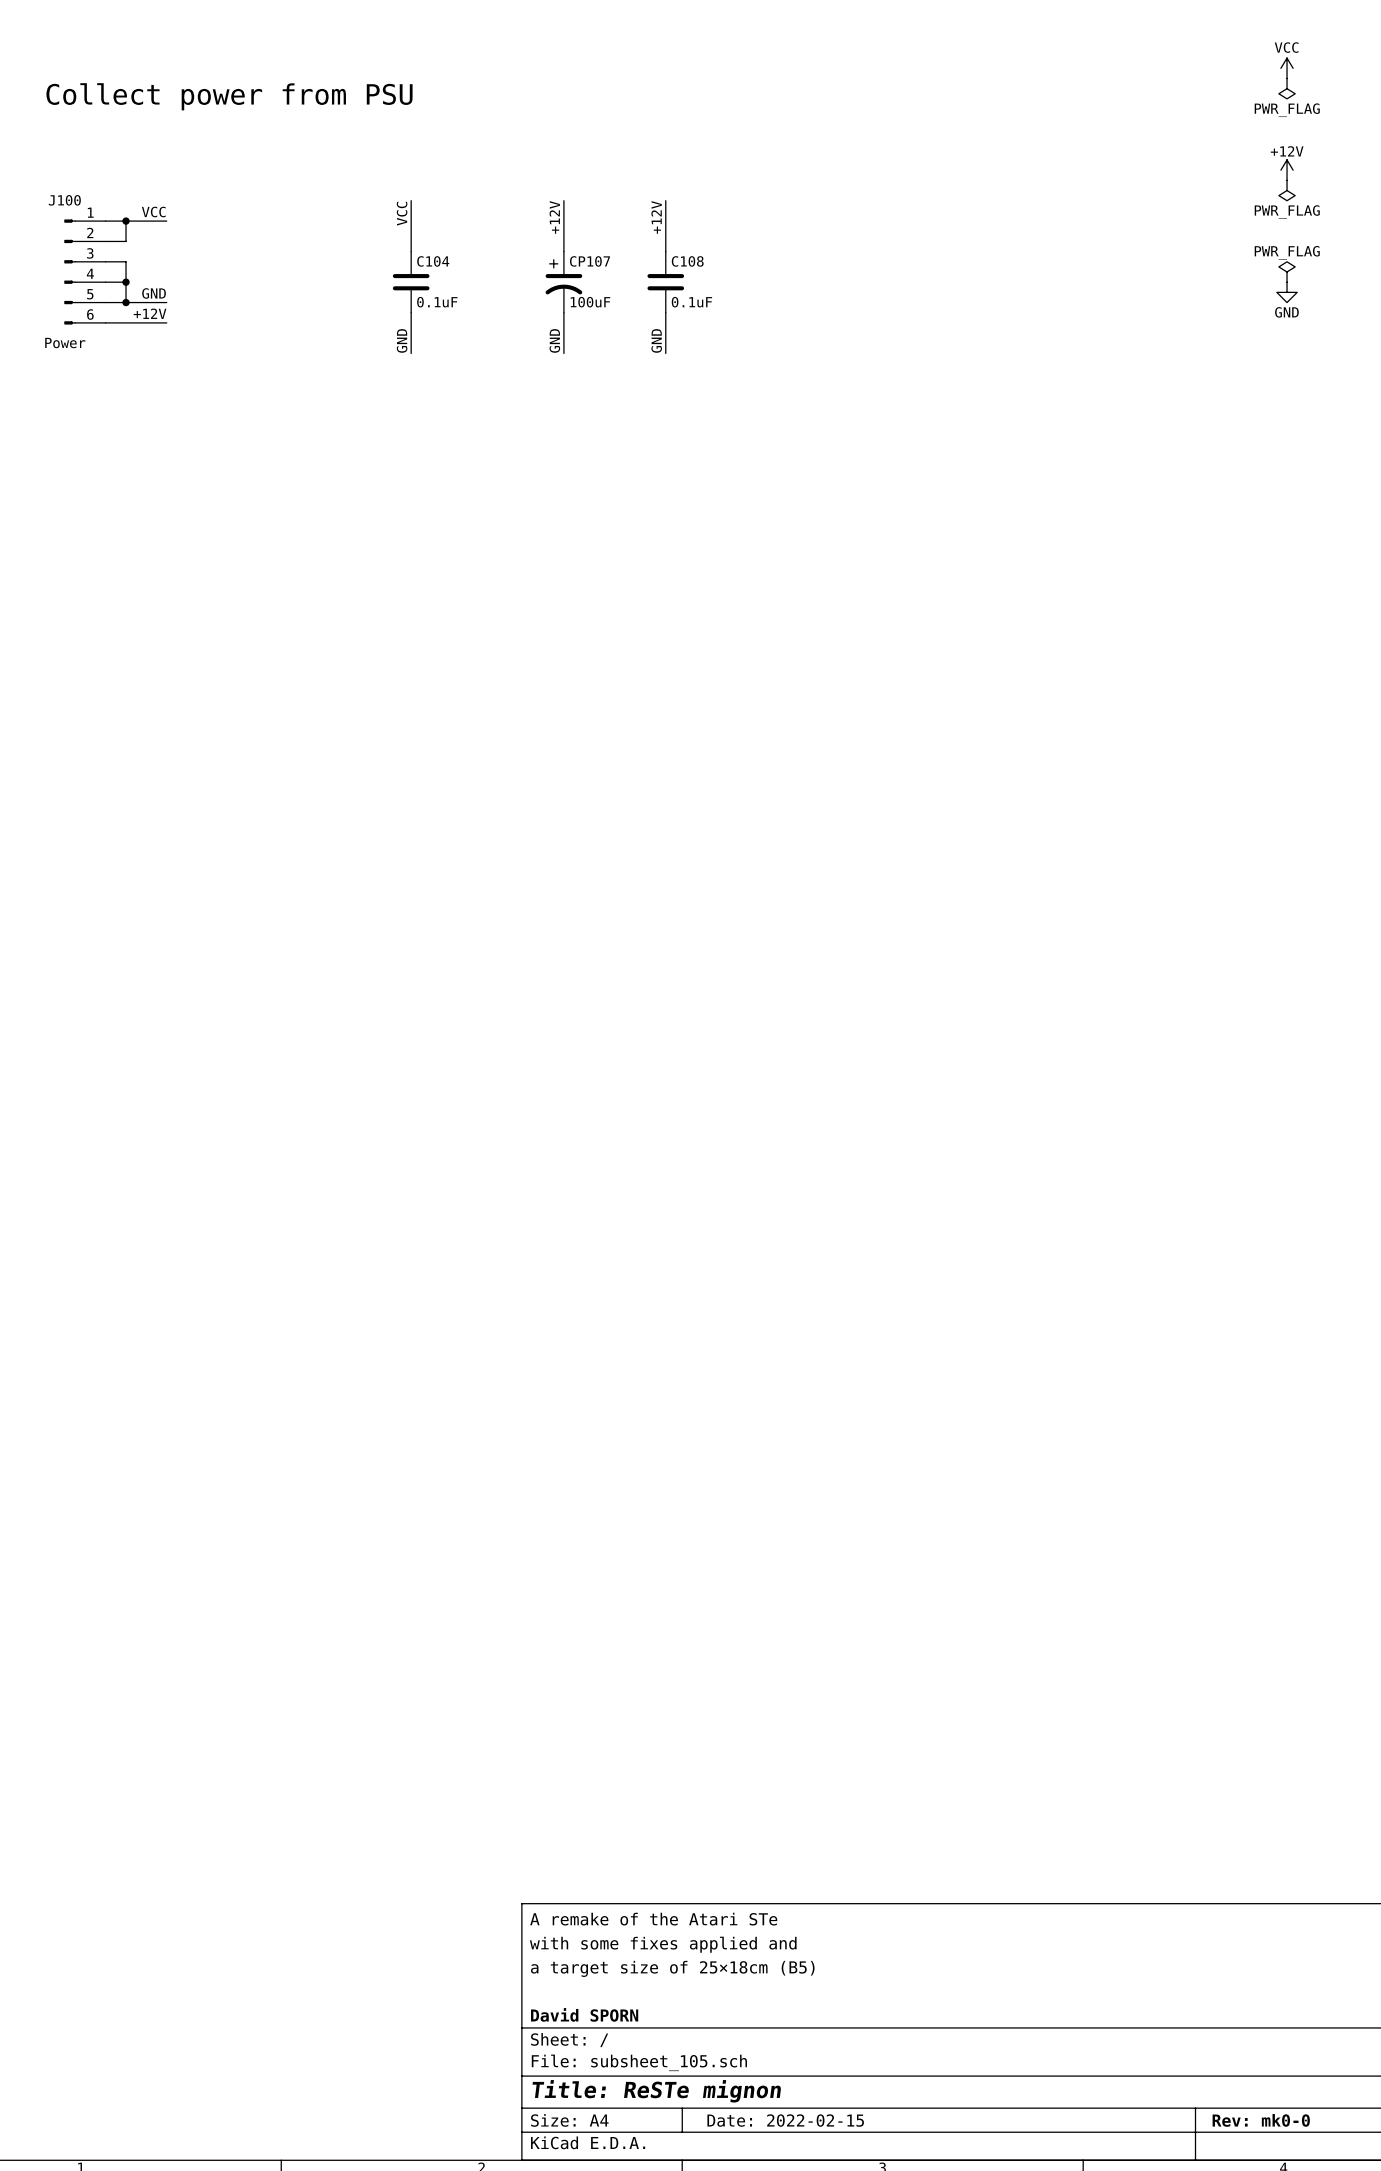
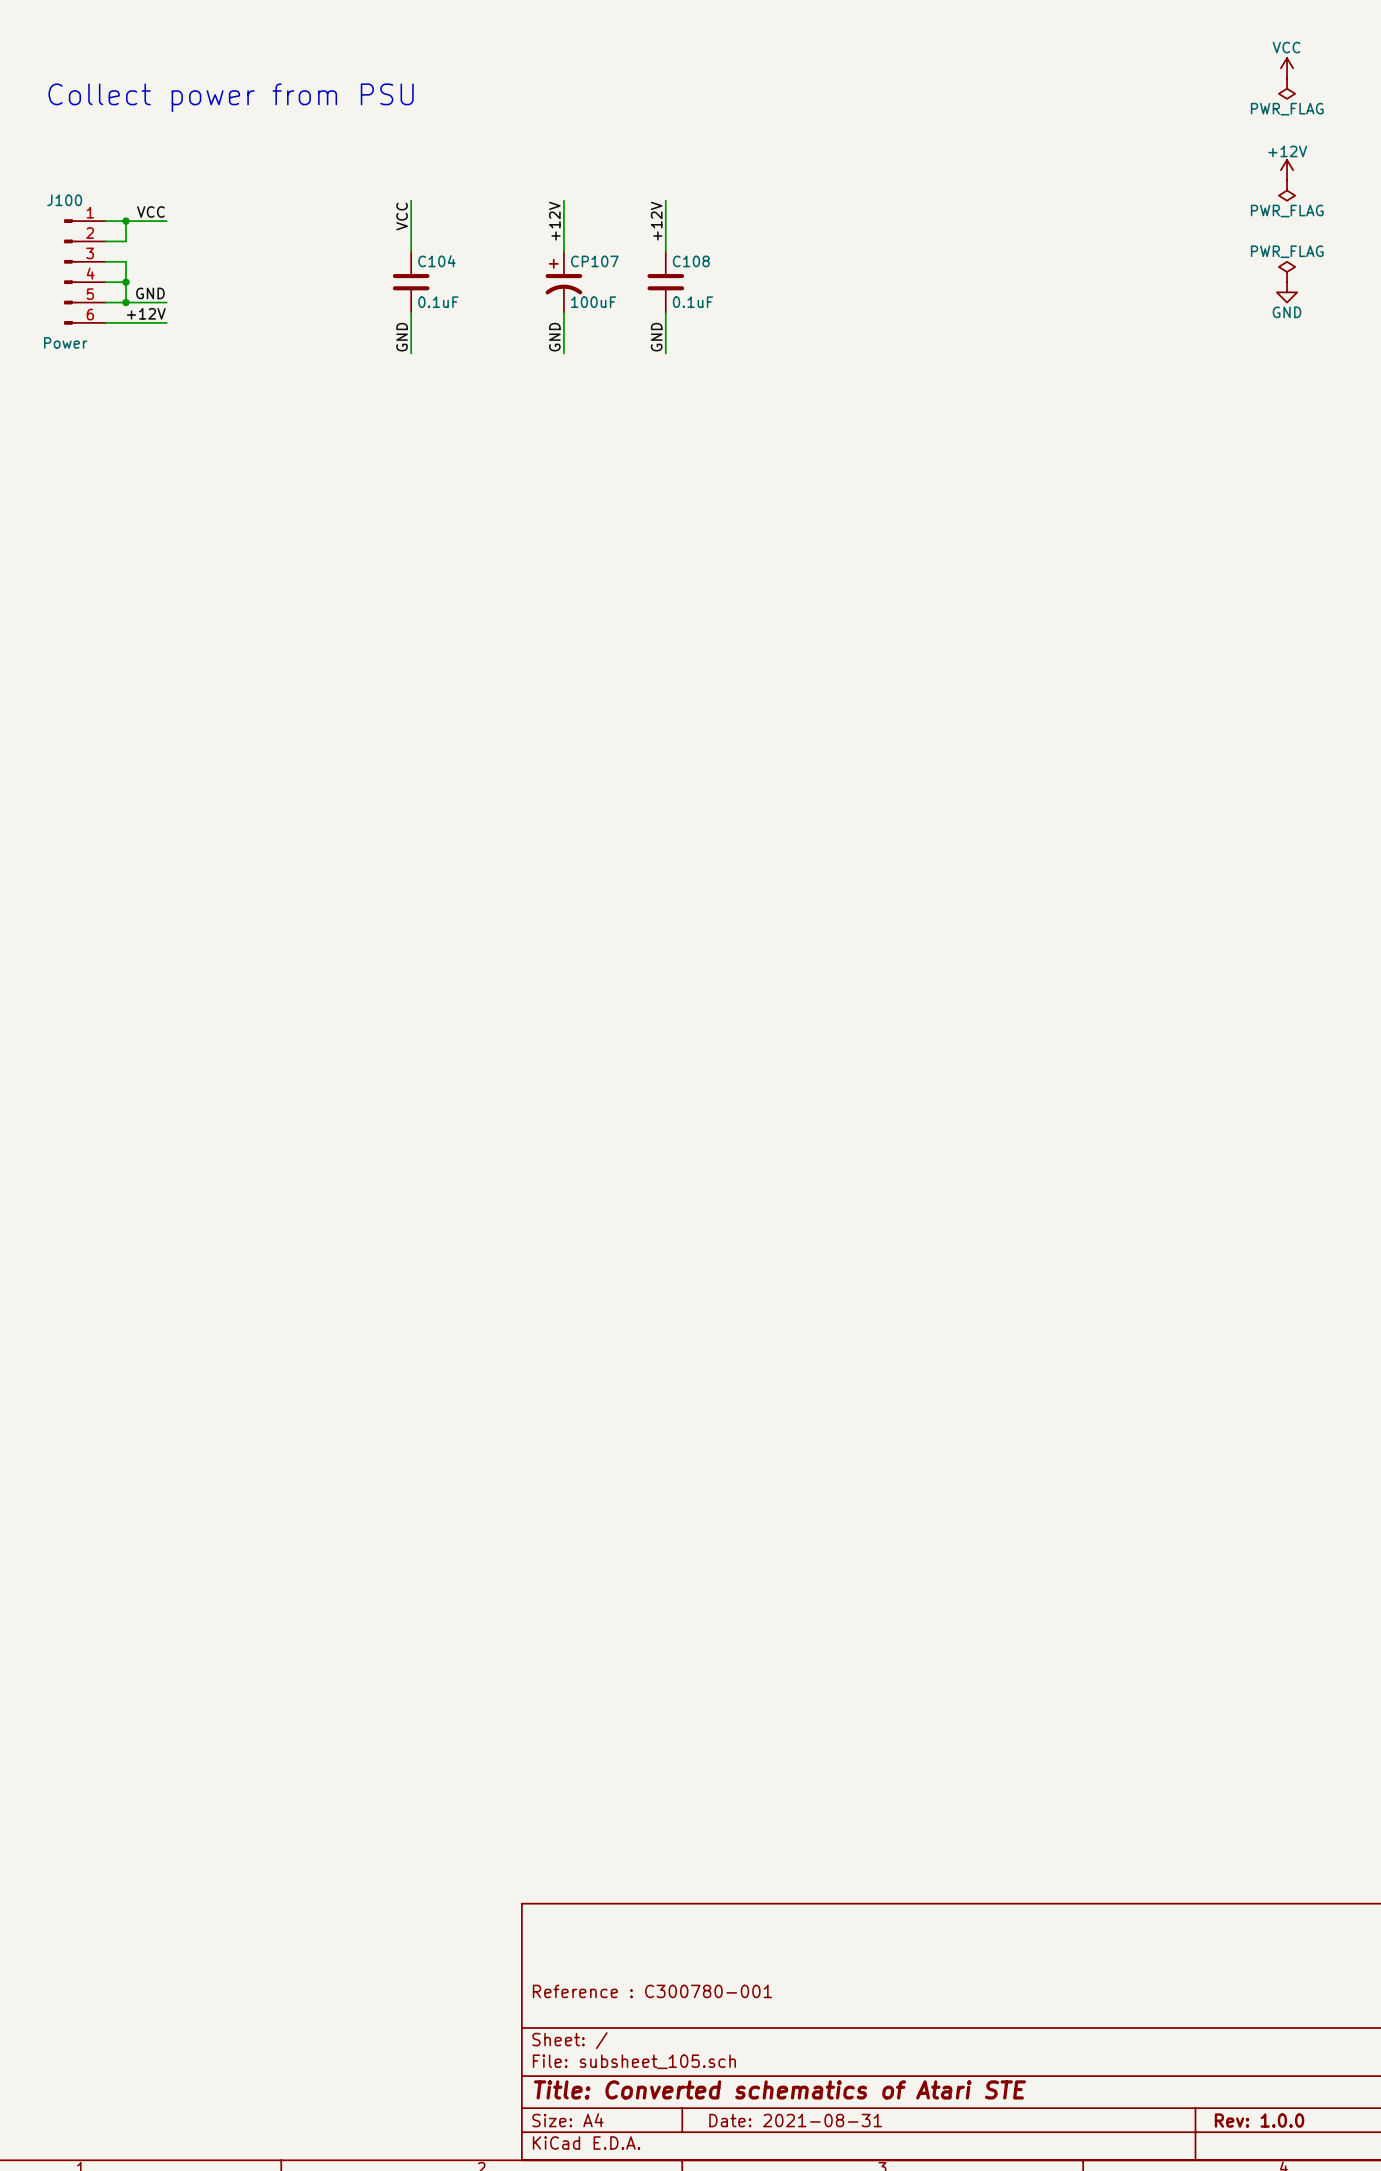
title block: A remake of the Atari STe (653, 1919) -> none
title block: with some fixes applied and (663, 1944) -> none
title block: a target size of 25×18cm (B5) (672, 1968) -> none
title block: none -> Reference : C300780-001 (652, 1991)
title block: David SPORN (584, 2014) -> none
title block: Title: ReSTe mignon (656, 2091) -> Title: Converted schematics of Atari STE (779, 2089)
title block: Date: 2022-02-15 (785, 2120) -> Date: 2021-08-31 (795, 2120)
title block: Rev: mk0-0 (1261, 2120) -> Rev: 1.0.0 (1259, 2120)

